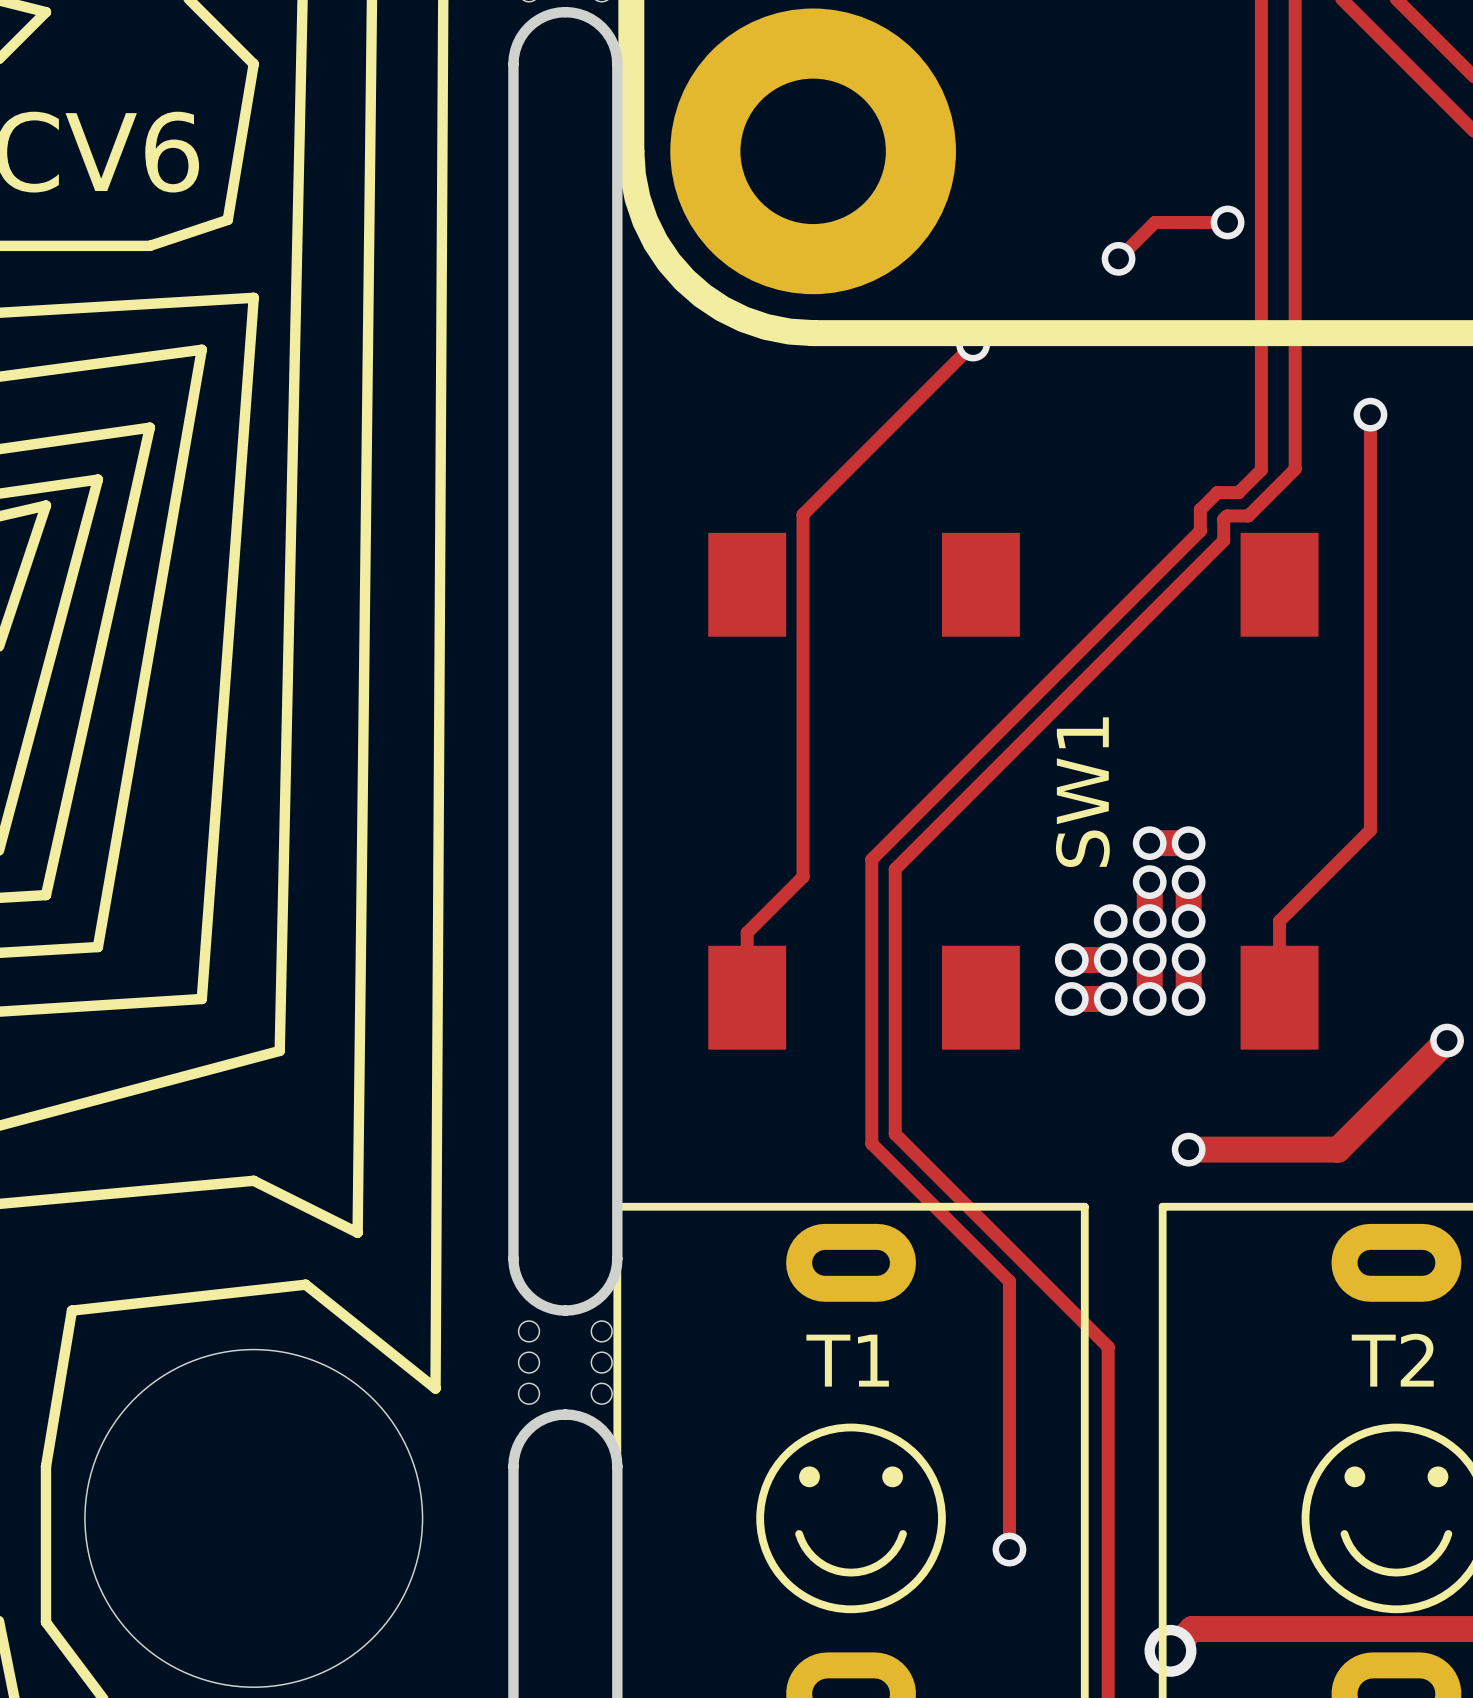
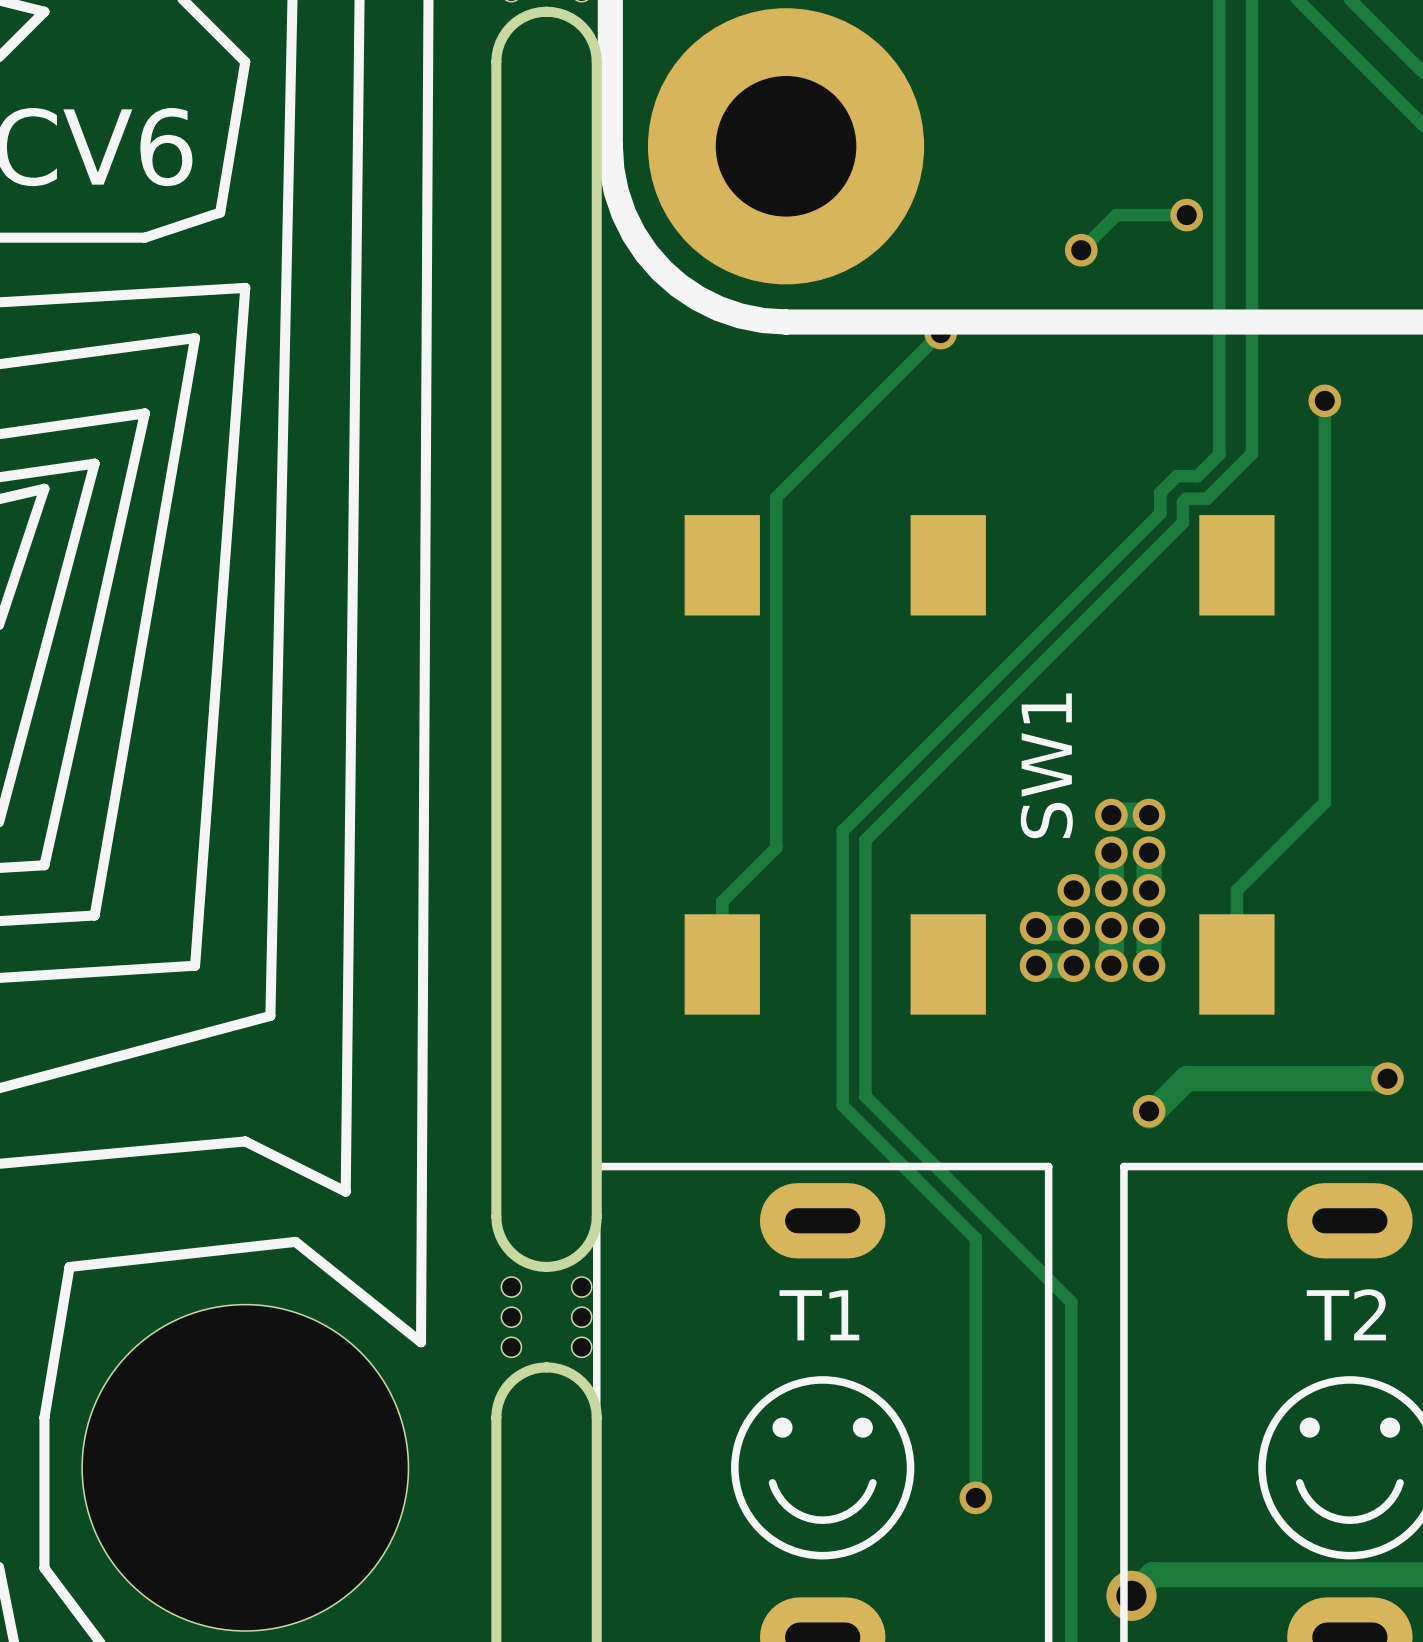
track: (1447, 1040) (1337, 1149) (1188, 1149) -> none
via position: (1447, 1040) -> (1387, 1078)
track: none -> (1387, 1078) (1186, 1078) (1149, 1116)

